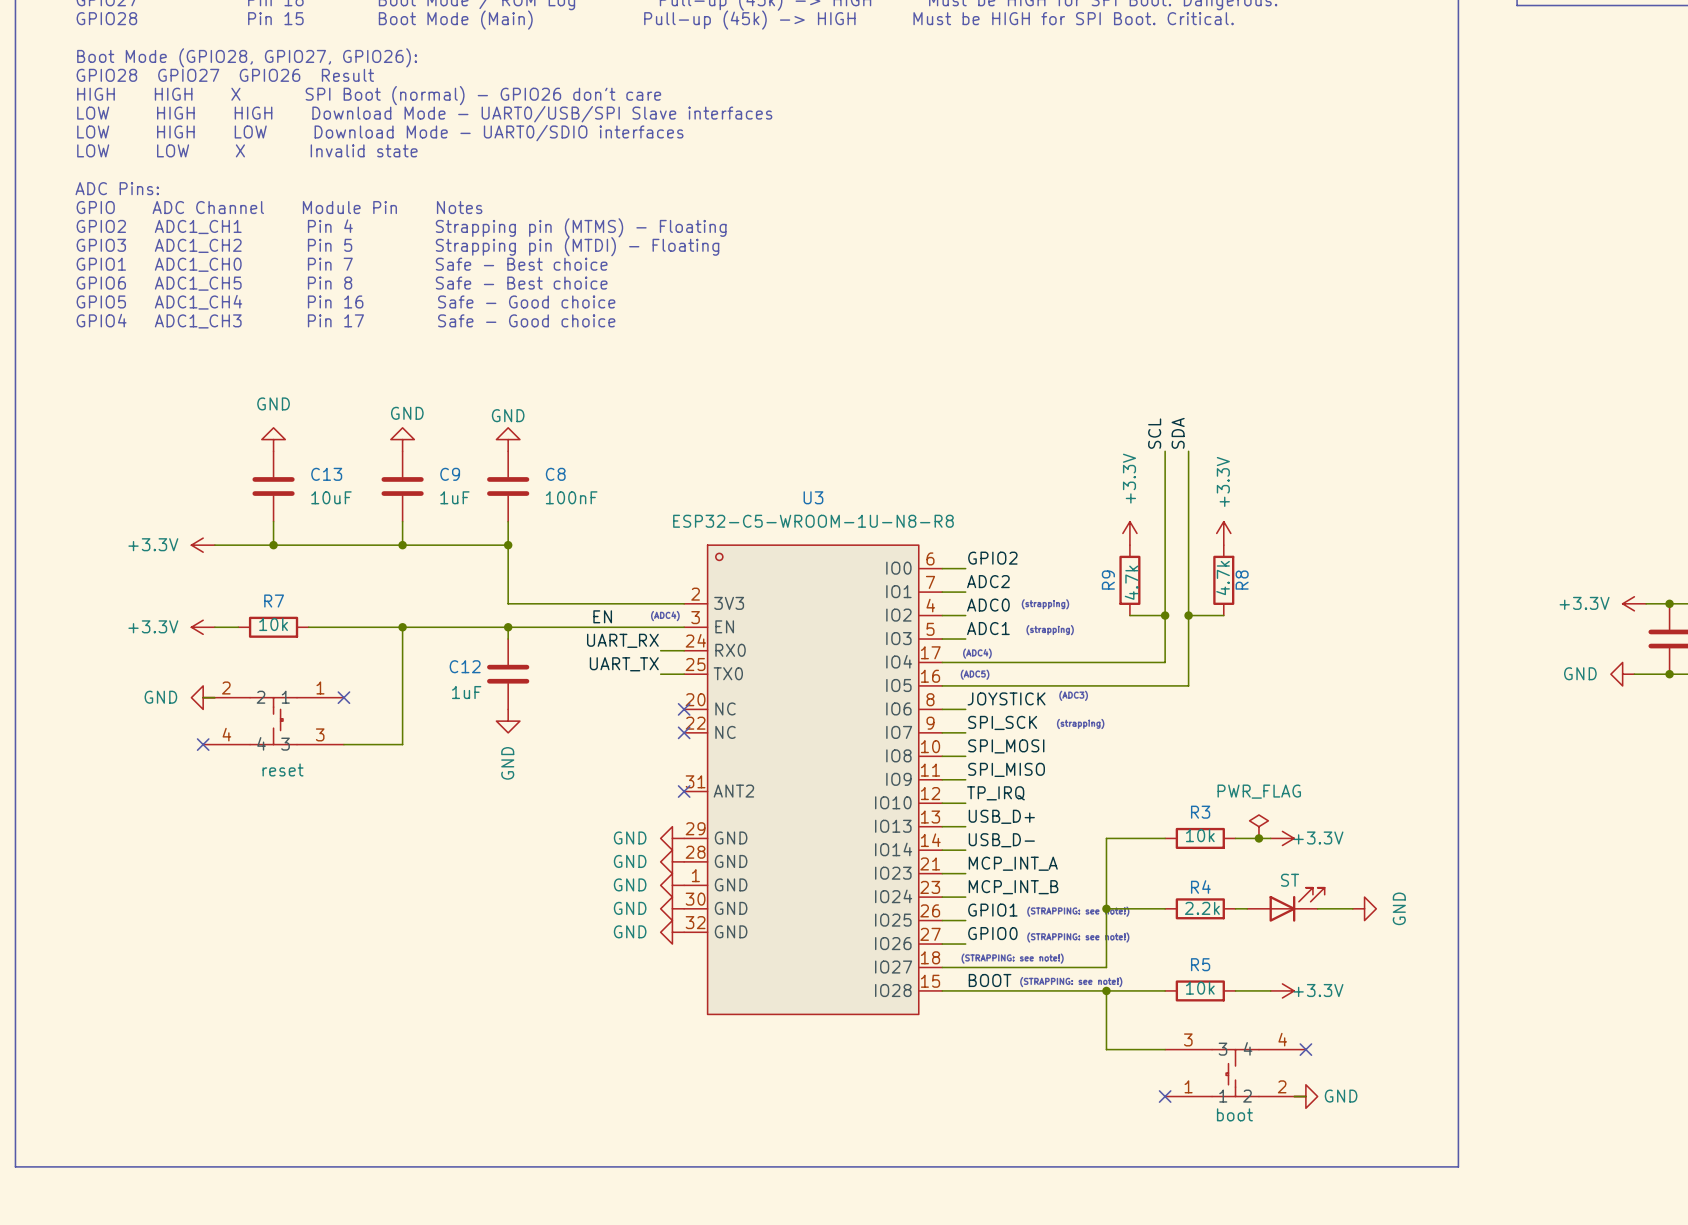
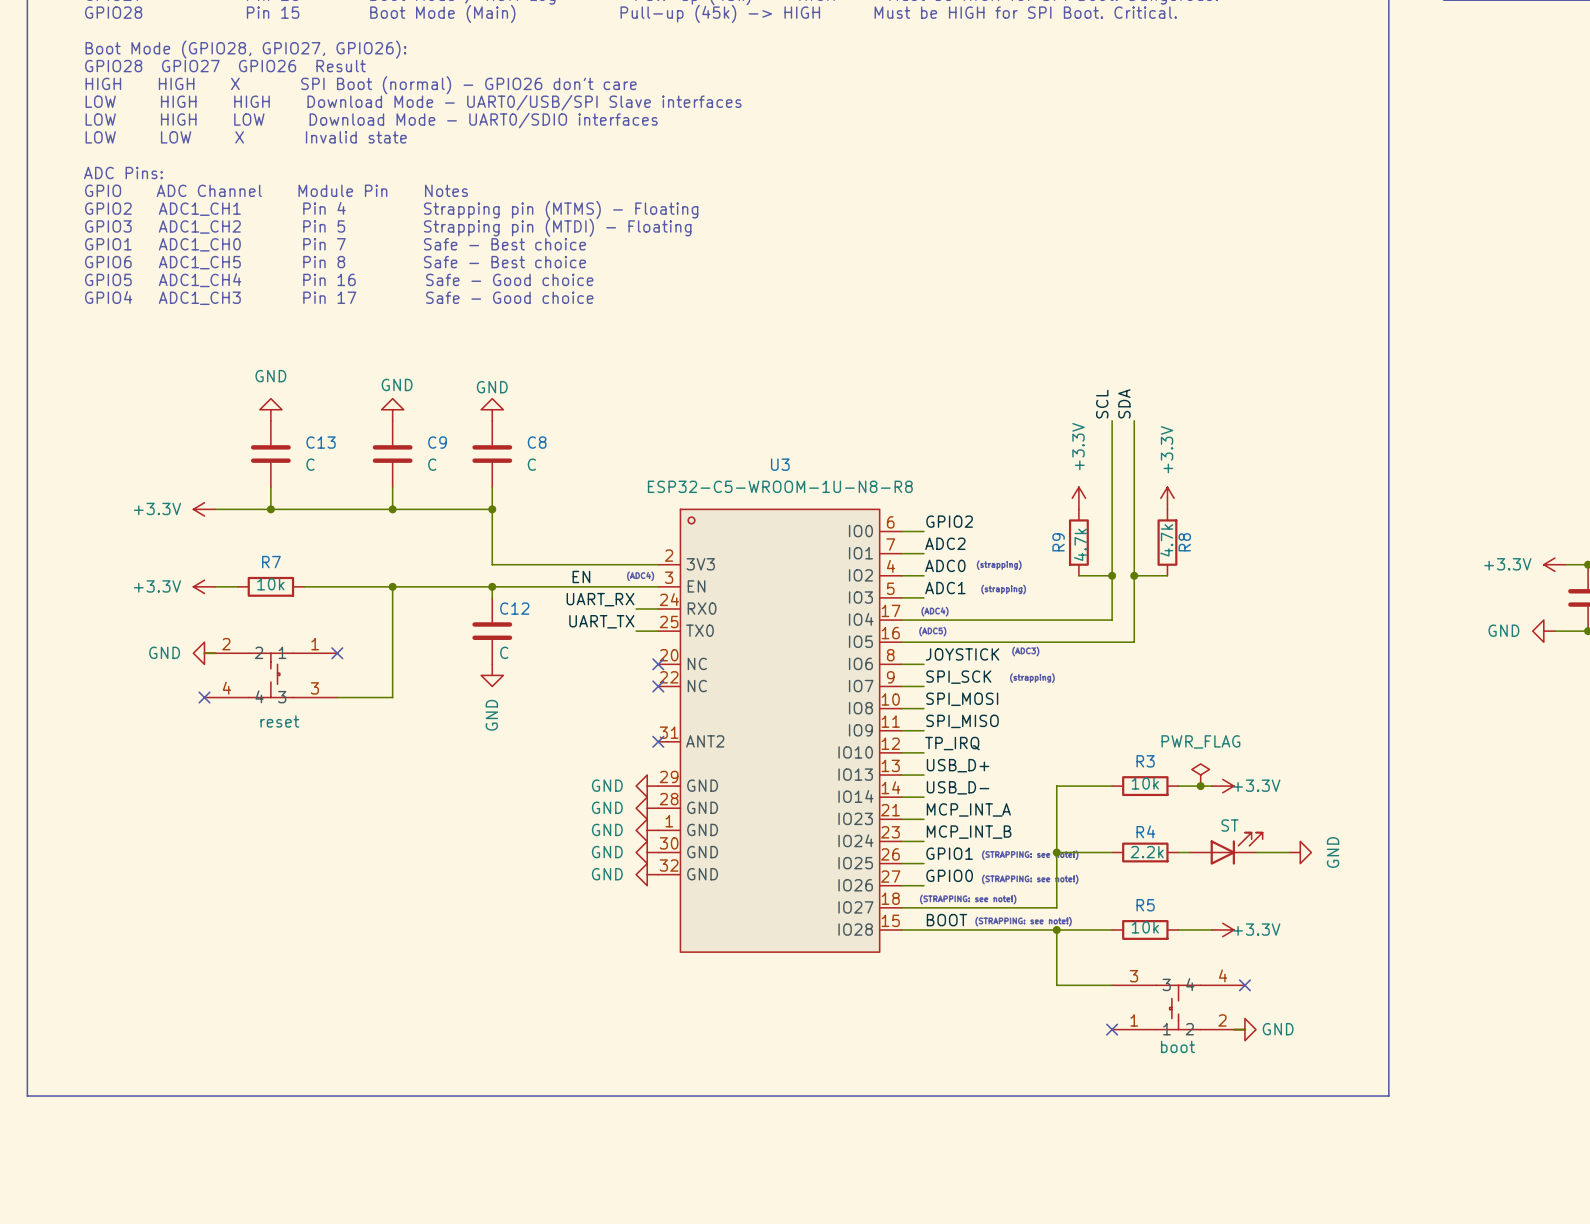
C13 value: 10uF (331, 497) -> C (310, 464)
C9 value: 1uF (454, 497) -> C (432, 464)
C8 value: 100nF (571, 497) -> C (531, 464)
C12 name position: C12 (465, 666) -> C12 (514, 608)
C12 value: 1uF (466, 692) -> C (504, 652)

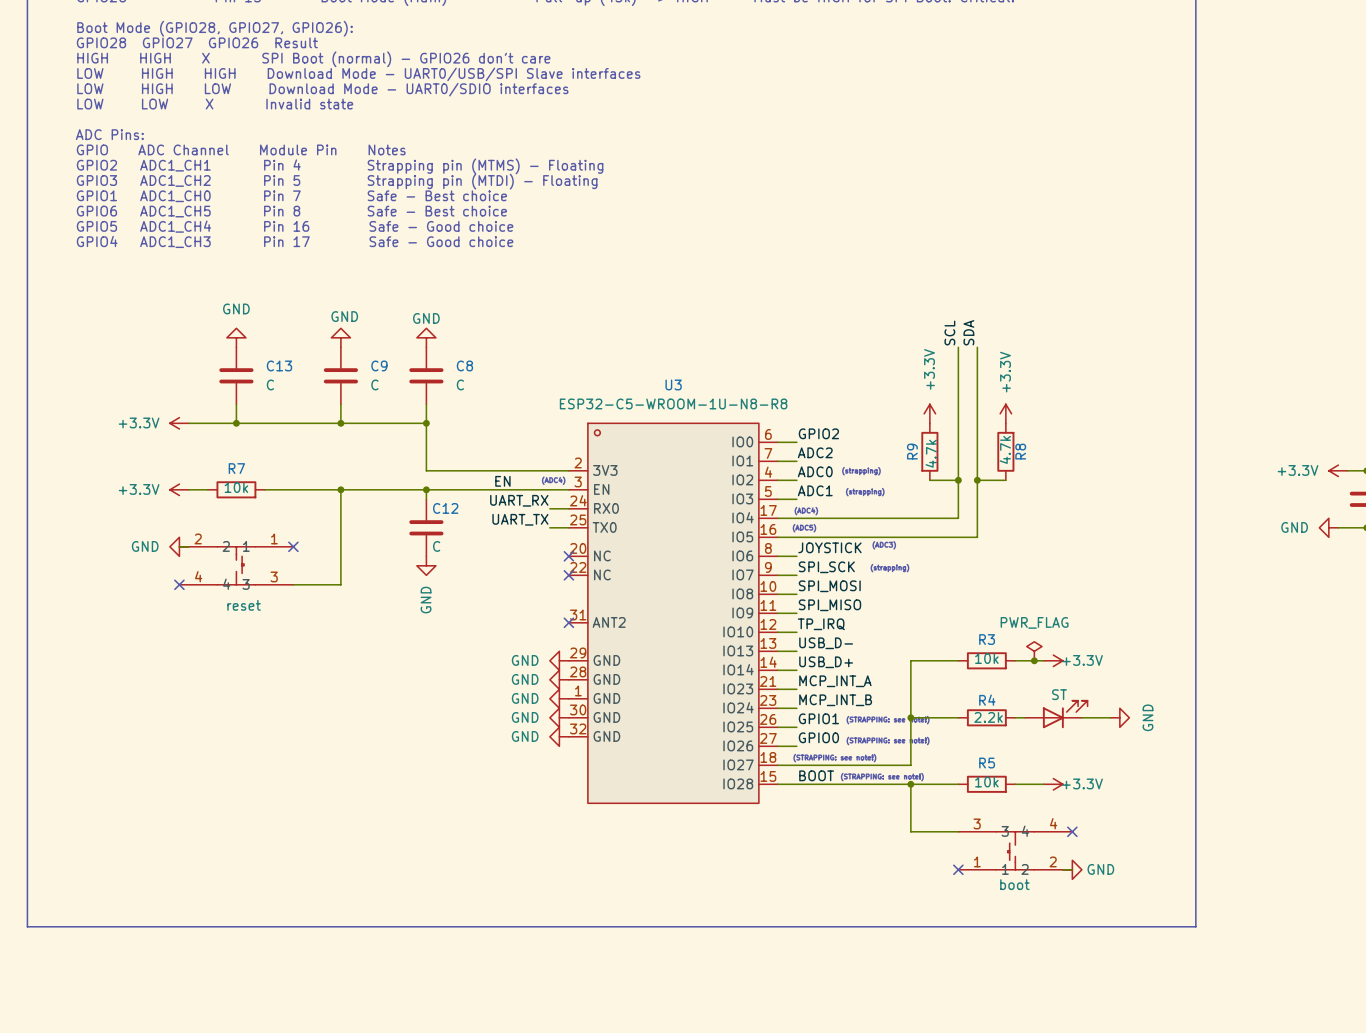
label: USB_D+ (958, 765) -> USB_D- (826, 643)
label: USB_D- (958, 787) -> USB_D+ (826, 662)

